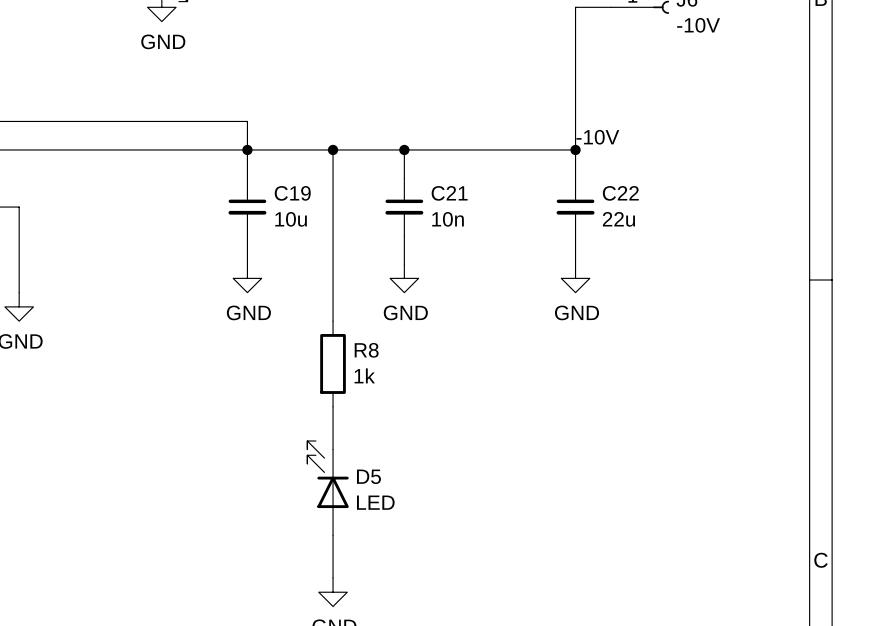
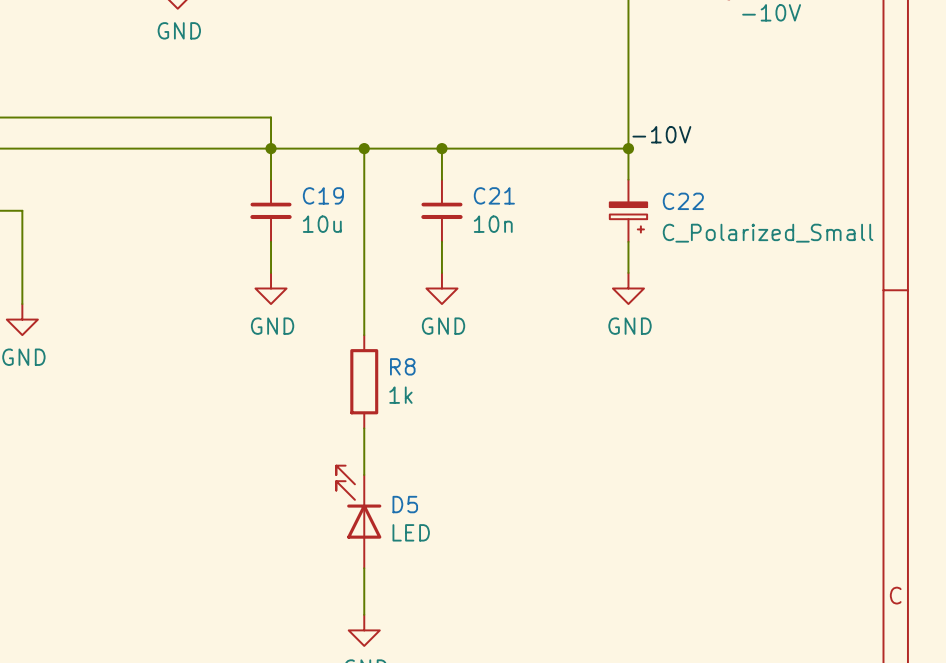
C22 symbol: [556, 178, 595, 236] -> [609, 179, 648, 242]
C22 value: 22u (618, 219) -> C_Polarized_Small (768, 233)

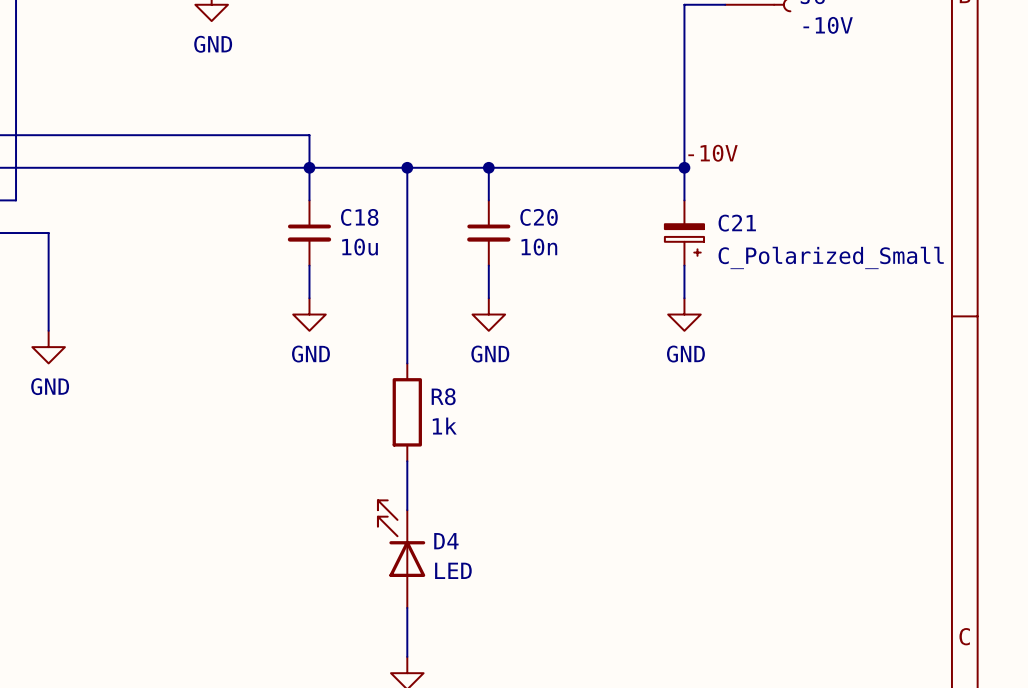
C19 name: C19 (323, 195) -> C18 (359, 217)
C21 name: C21 (494, 195) -> C20 (539, 217)
C22 name: C22 (683, 201) -> C21 (737, 223)
D5 name: D5 (405, 504) -> D4 (446, 541)

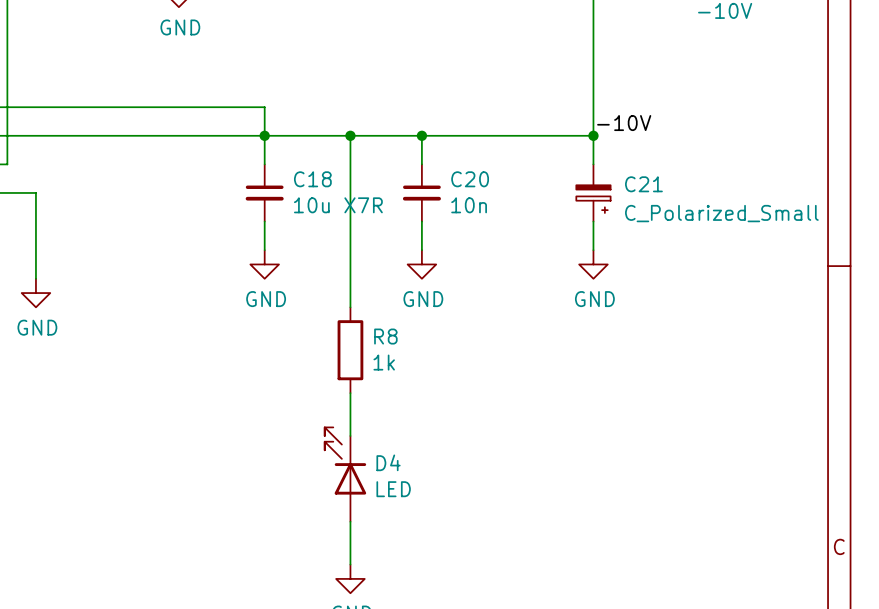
C18 value: 10u (360, 247) -> 10u X7R (338, 205)

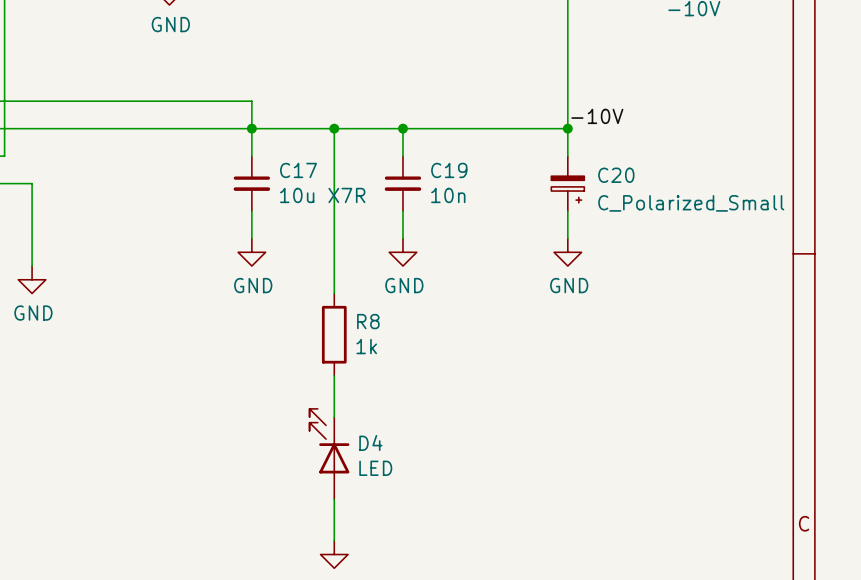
C18 name: C18 (312, 179) -> C17 (298, 170)
C20 name: C20 (470, 179) -> C19 (449, 170)
C21 name: C21 (643, 184) -> C20 (616, 175)

